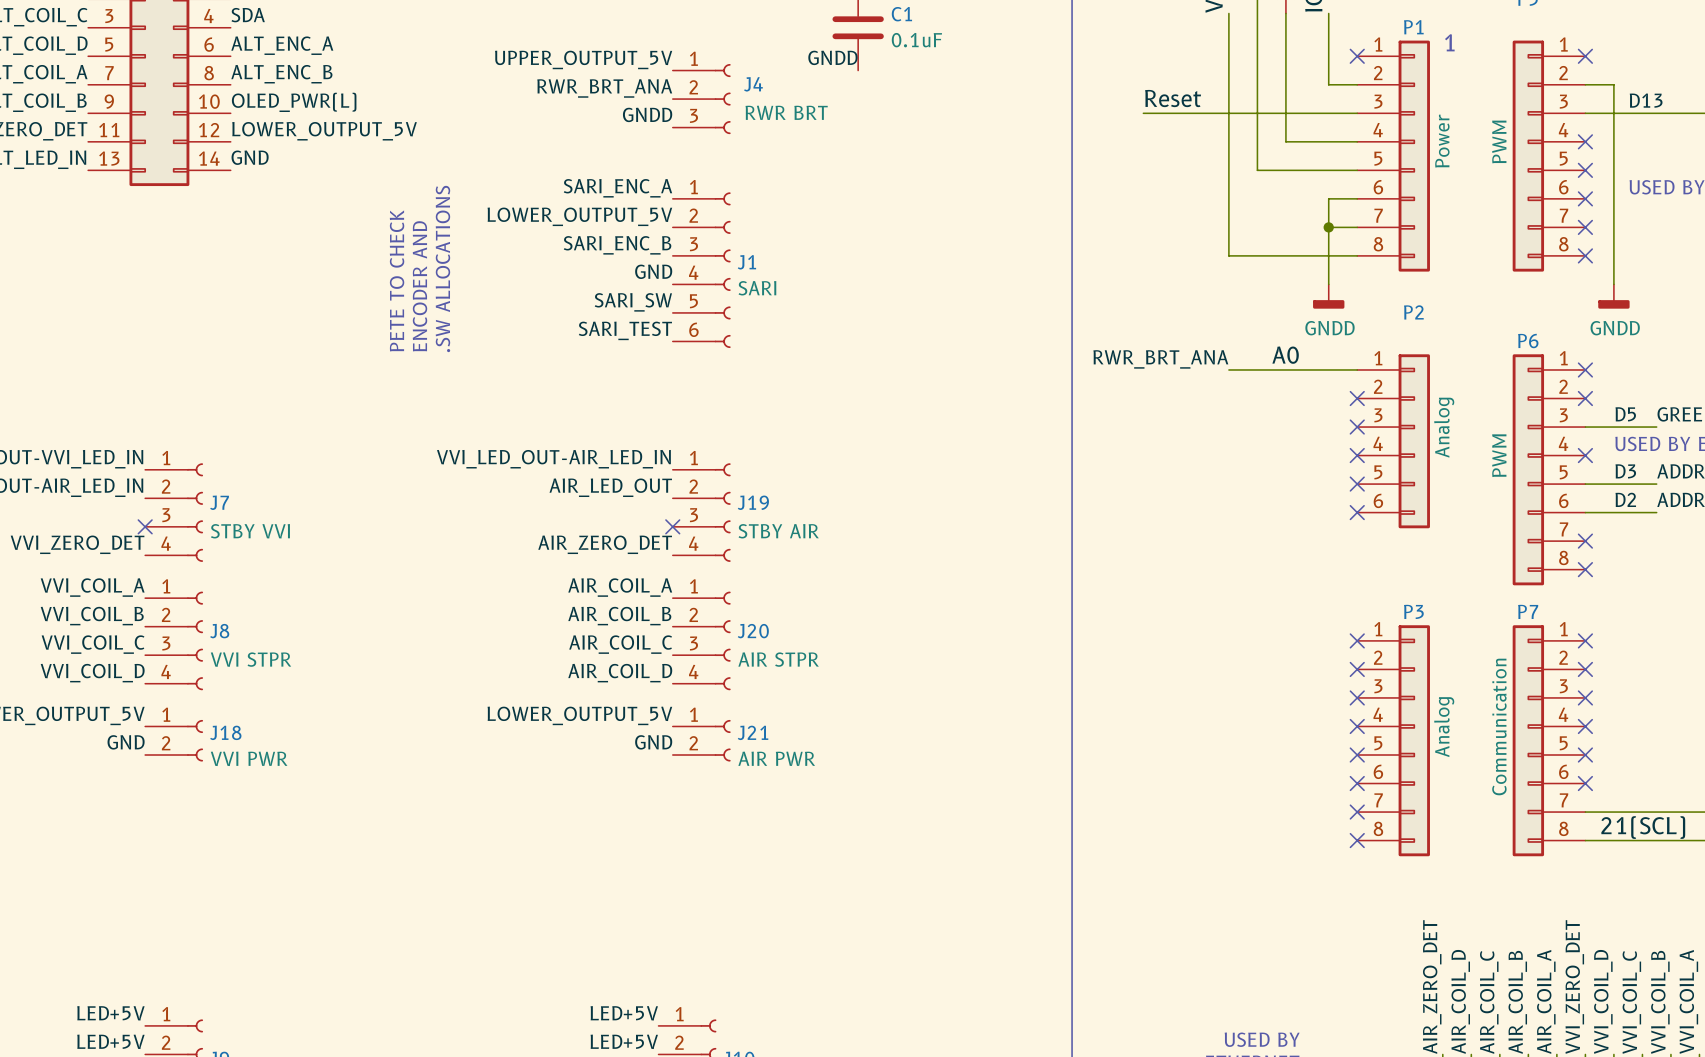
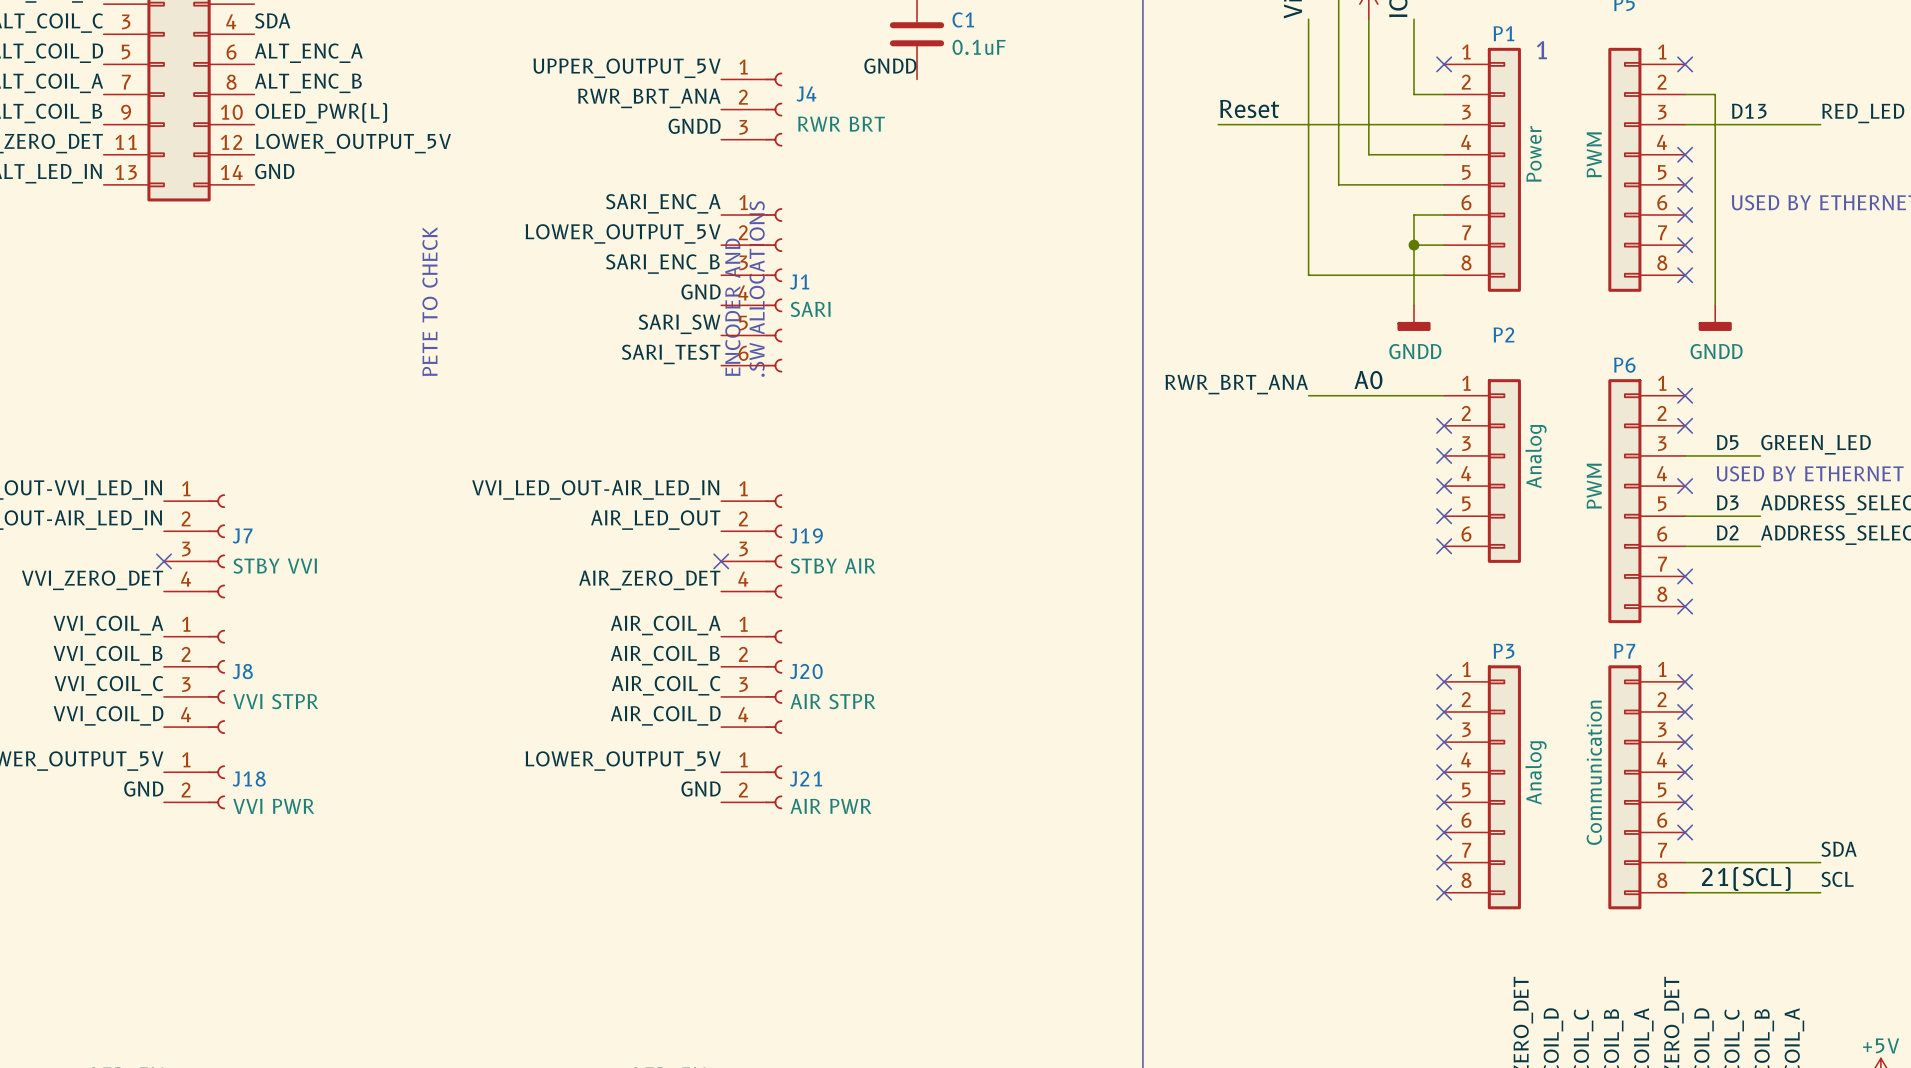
text position: .SW ALLOCATIONS (442, 268) -> .SW ALLOCATIONS (757, 289)
text position: ENCODER AND (420, 286) -> ENCODER AND (732, 307)

